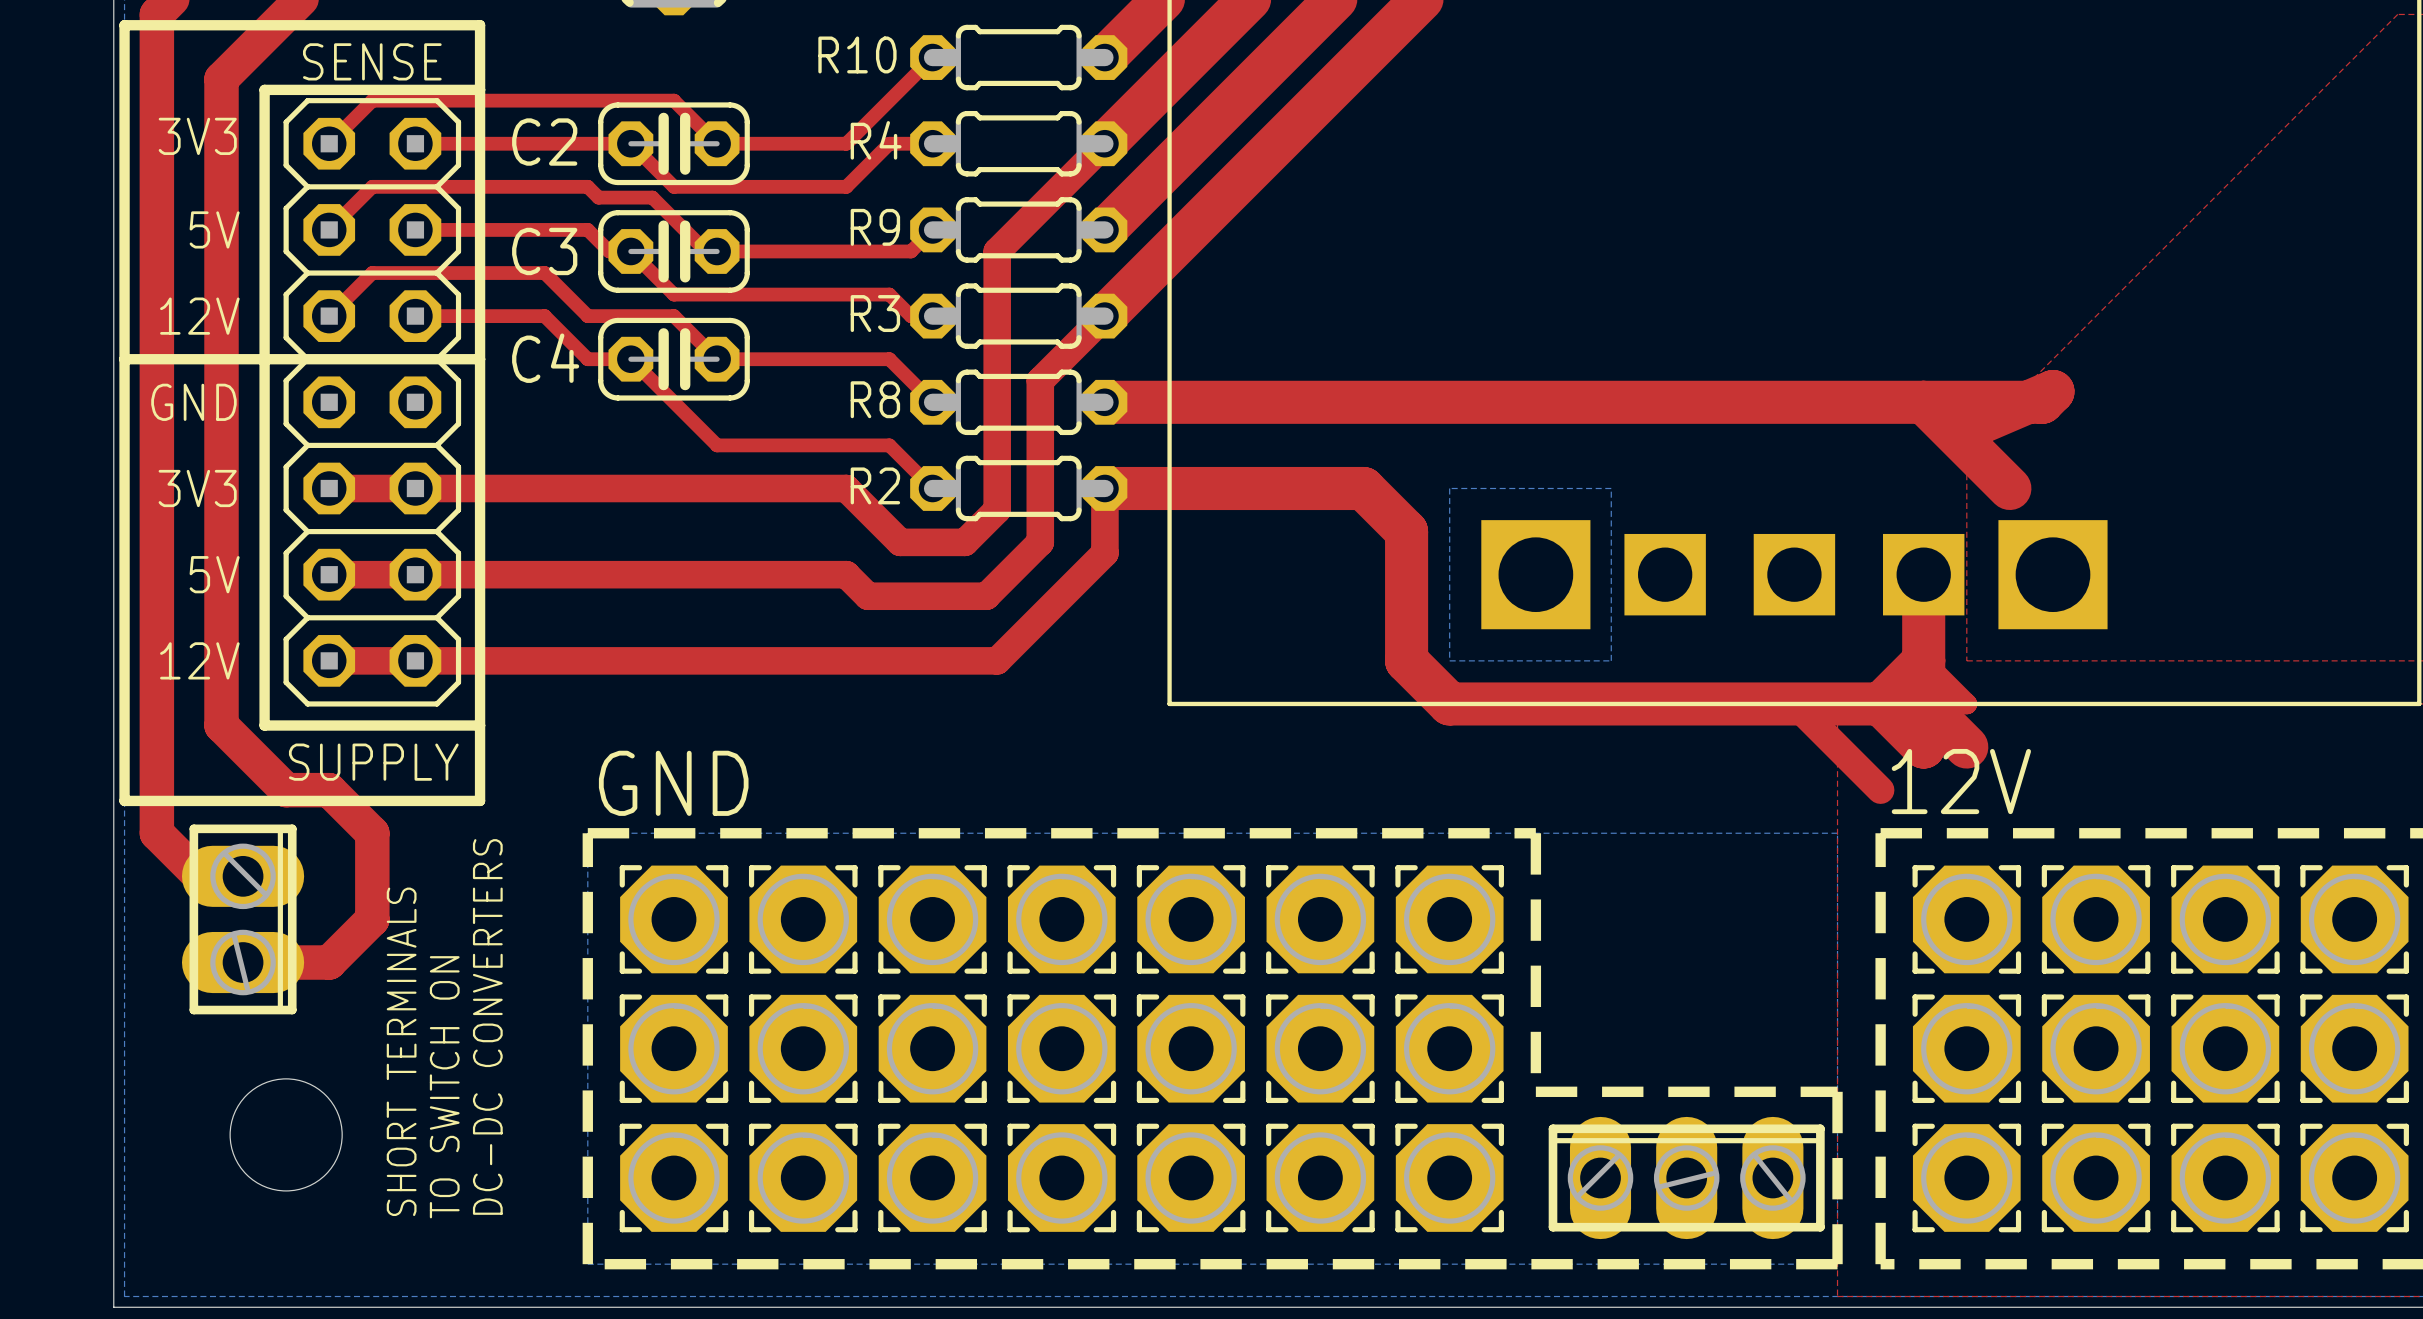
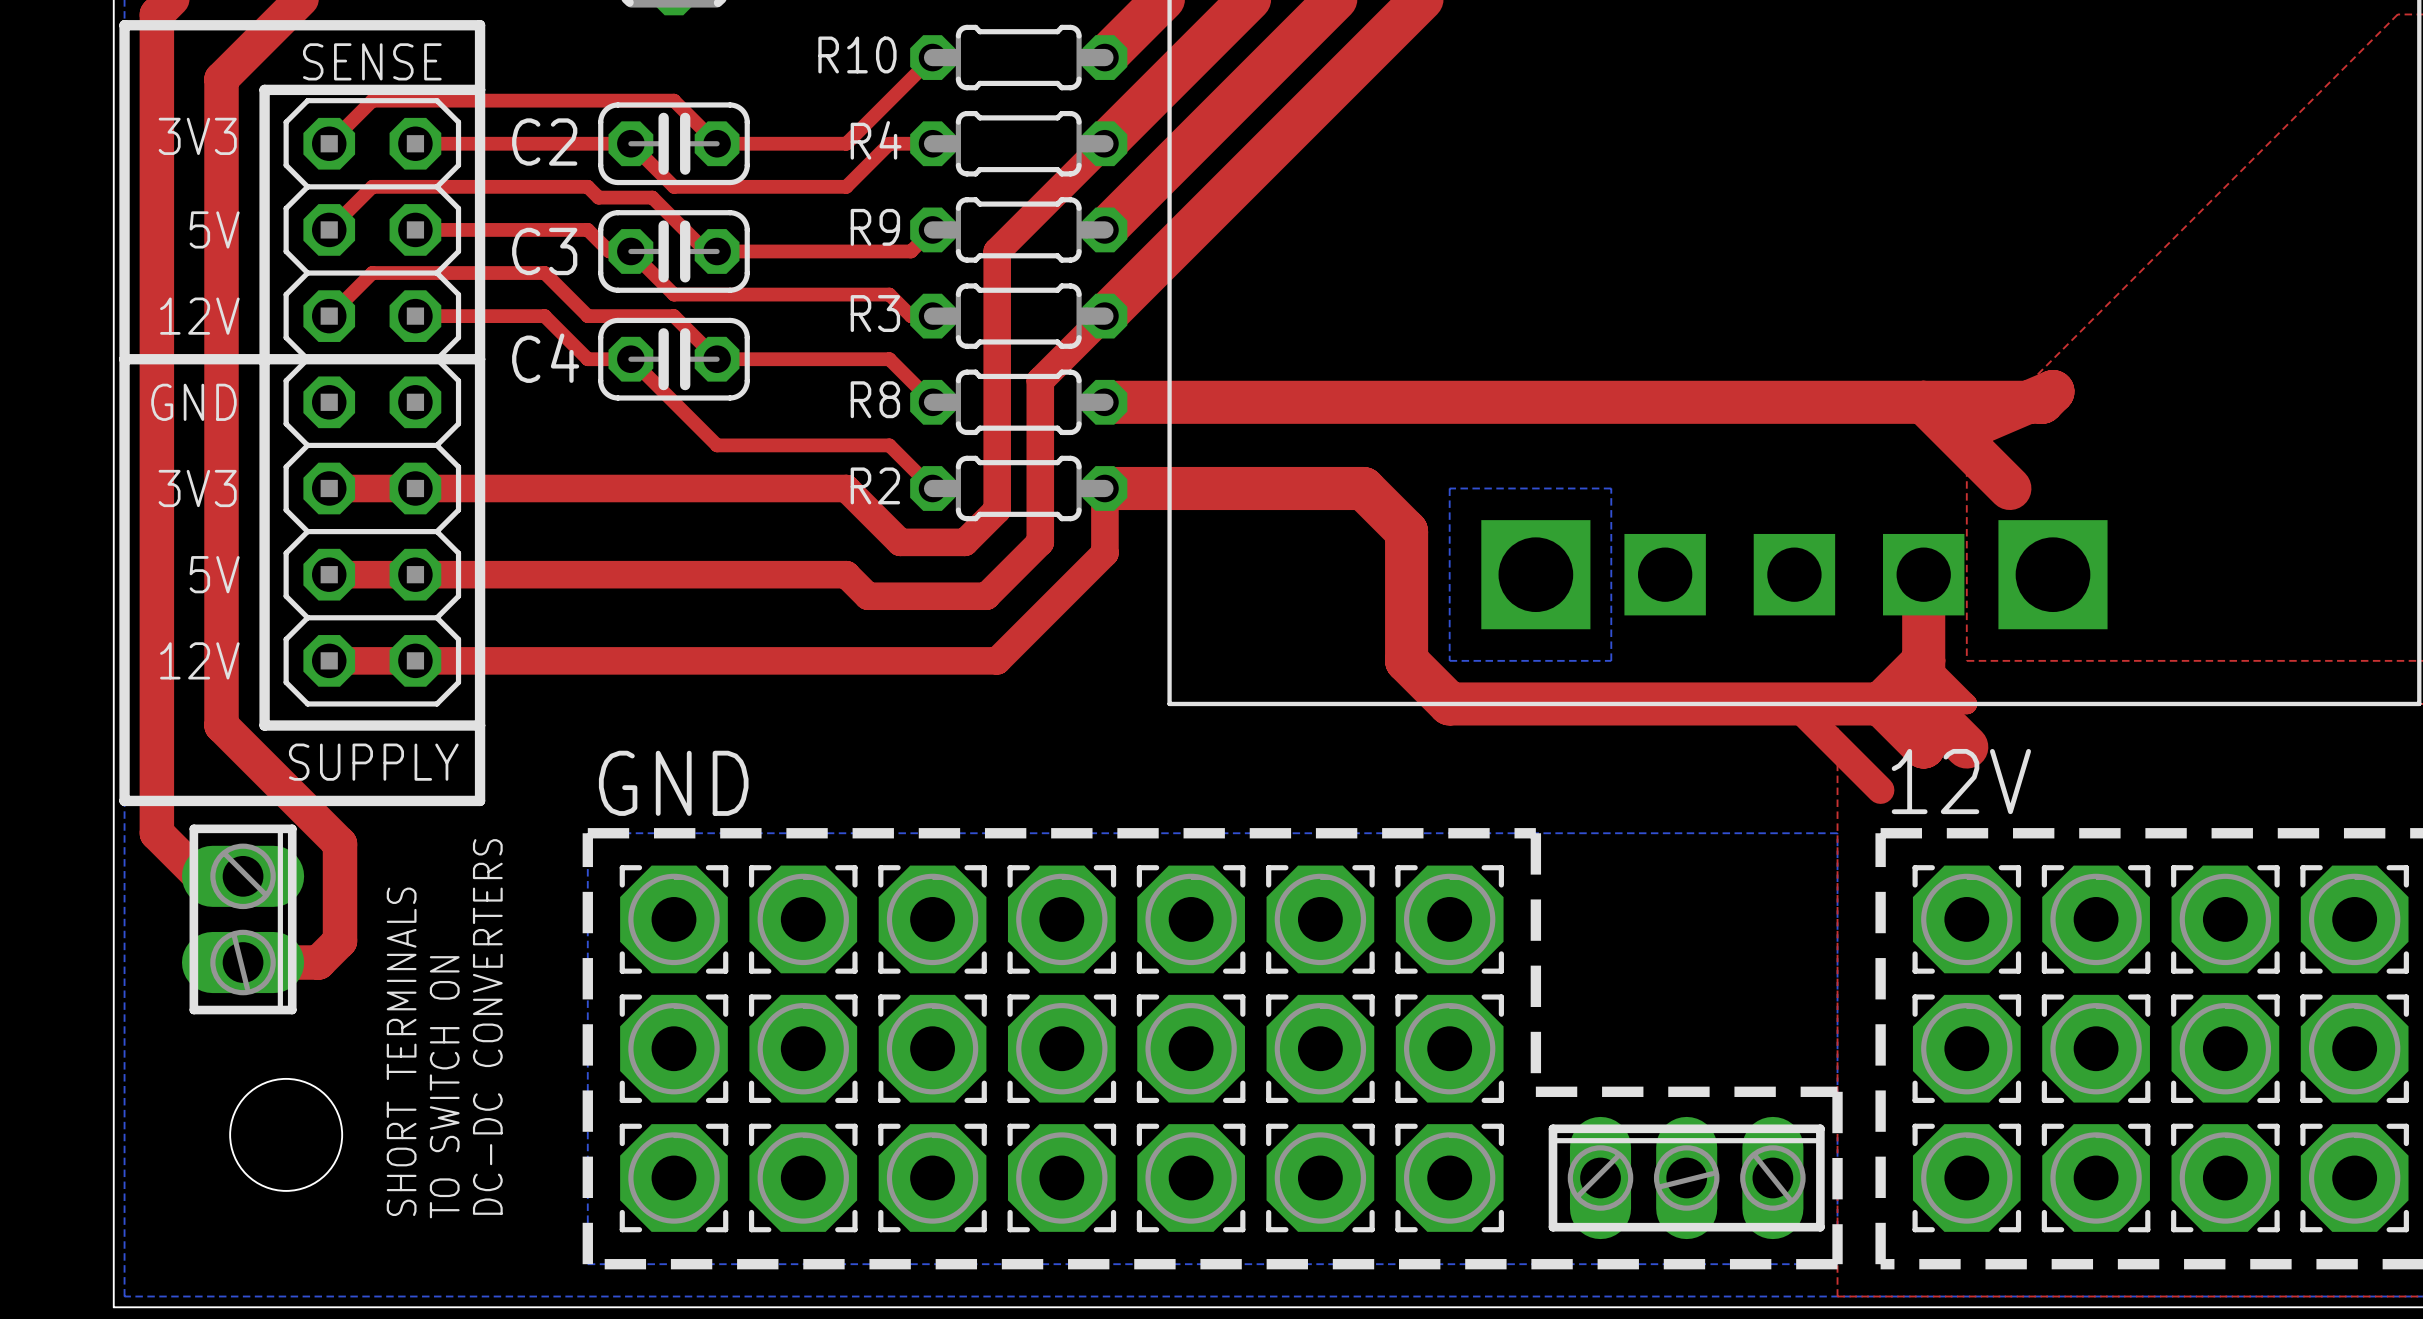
top track: (286, 790) (329, 790) (372, 833) (372, 919) (329, 962) (318, 962) -> (286, 790) (340, 844) (340, 940) (318, 962)

